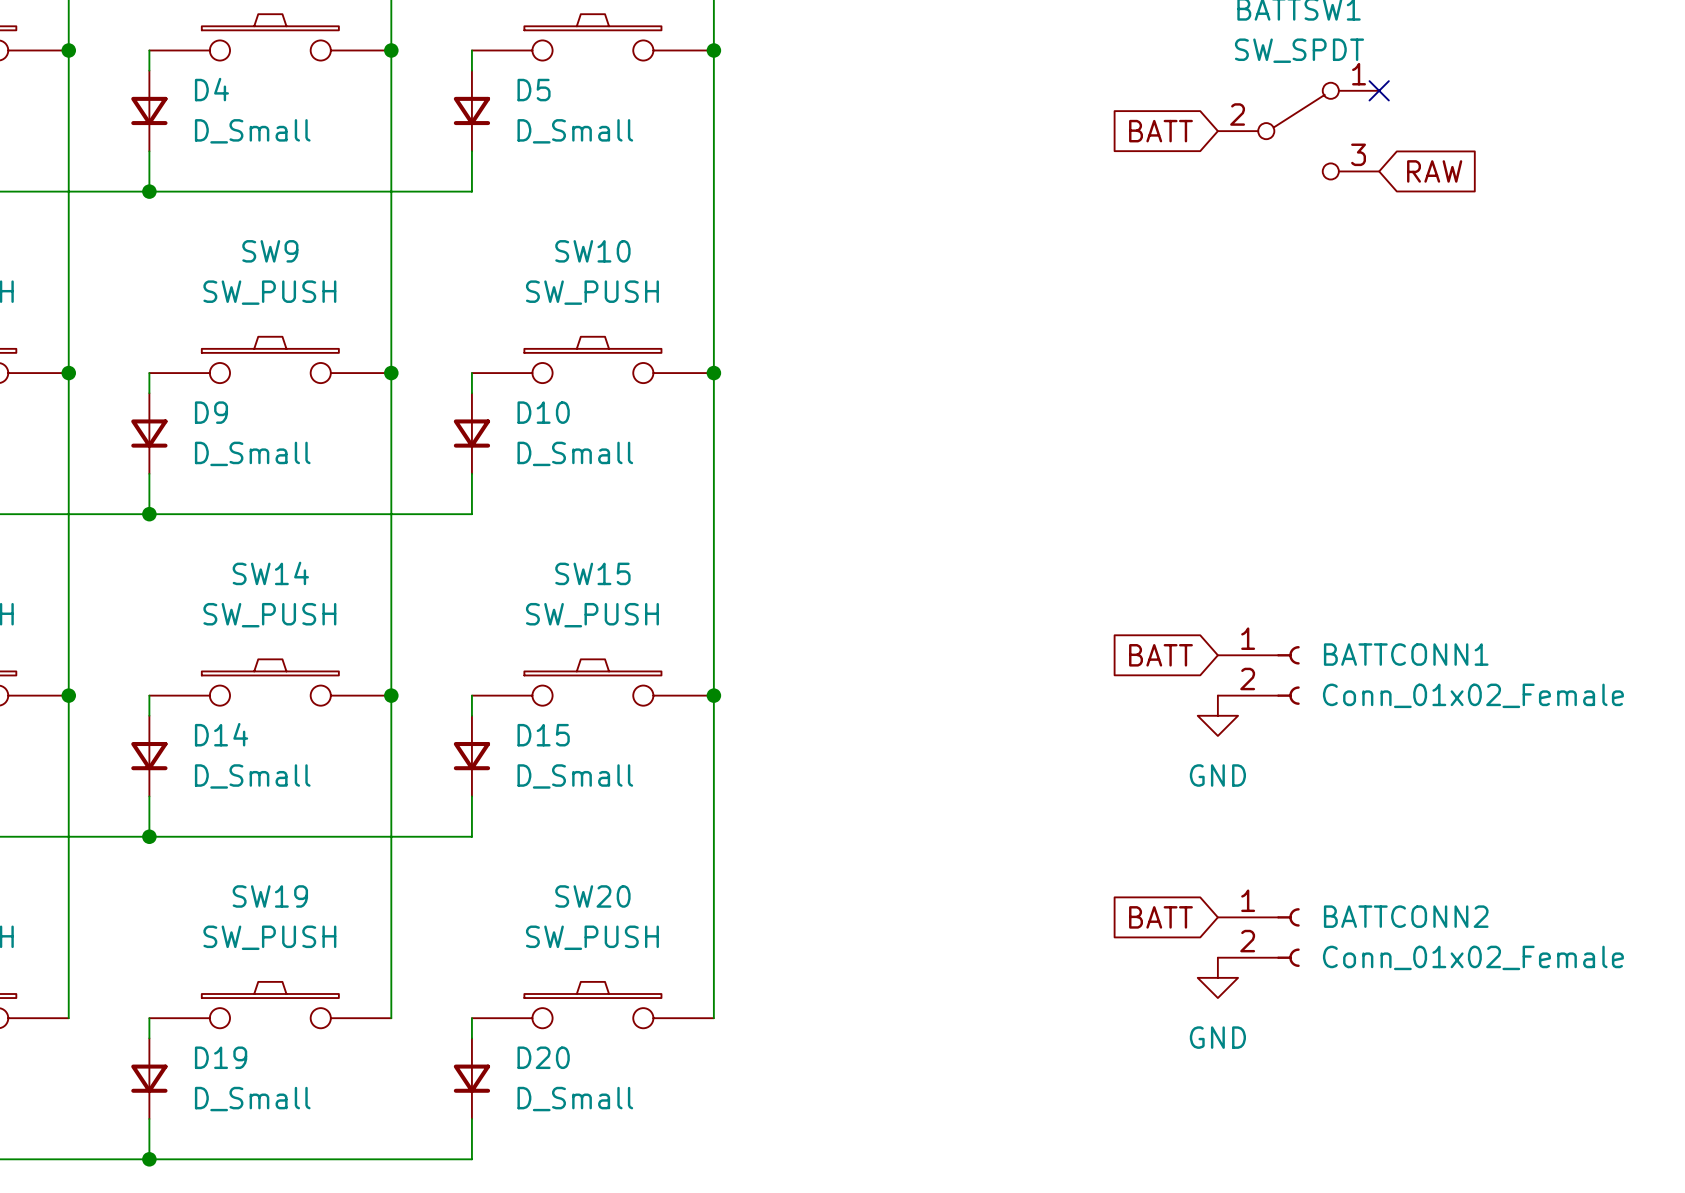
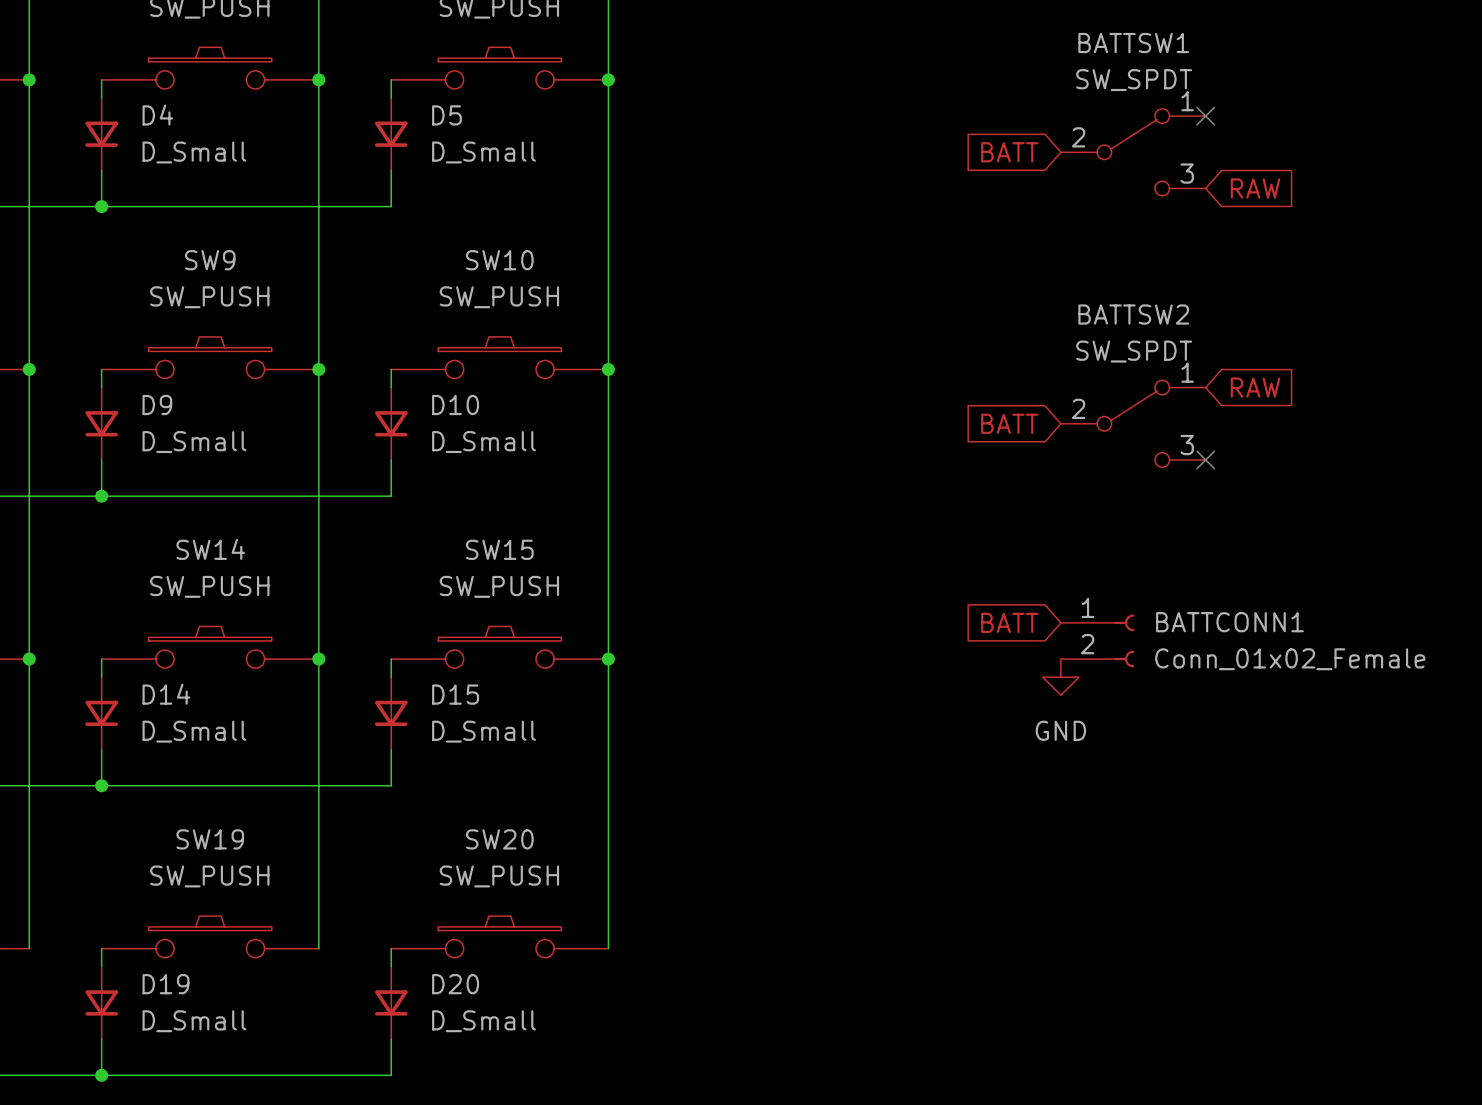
global label: none -> RAW (1255, 387)
global label: none -> BATT (1009, 423)
BATTSW2: none -> SW_SPDT (1133, 423)
no-connect mark: none -> (1205, 459)
global label: BATT (1160, 917) -> none
BATTCONN2: Conn_01x02_Female (1258, 937) -> none
power symbol: GND (1217, 977) -> none

